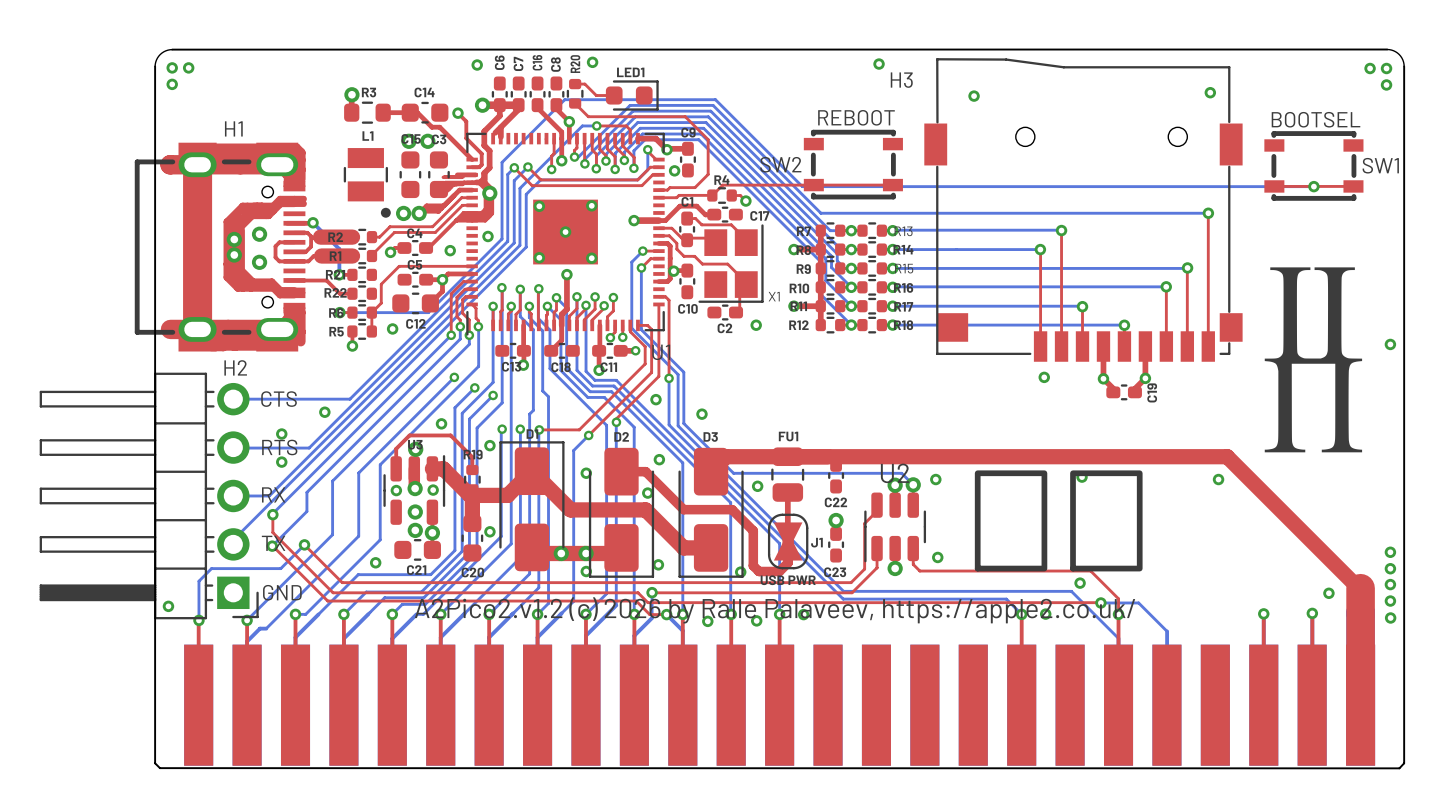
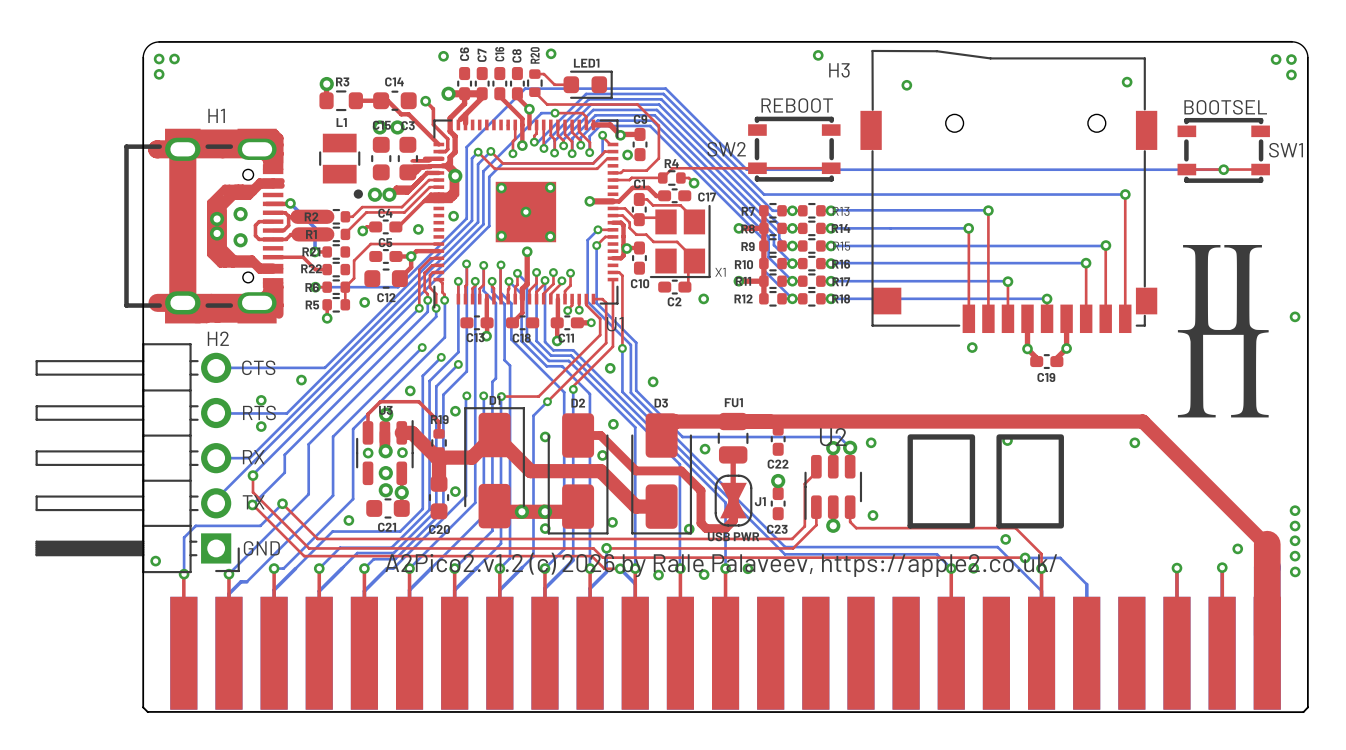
C19 name rotation: 0° (1152, 392) -> 90° clockwise (1046, 377)
C19 name position: C19 (1152, 392) -> C19 (1046, 377)

